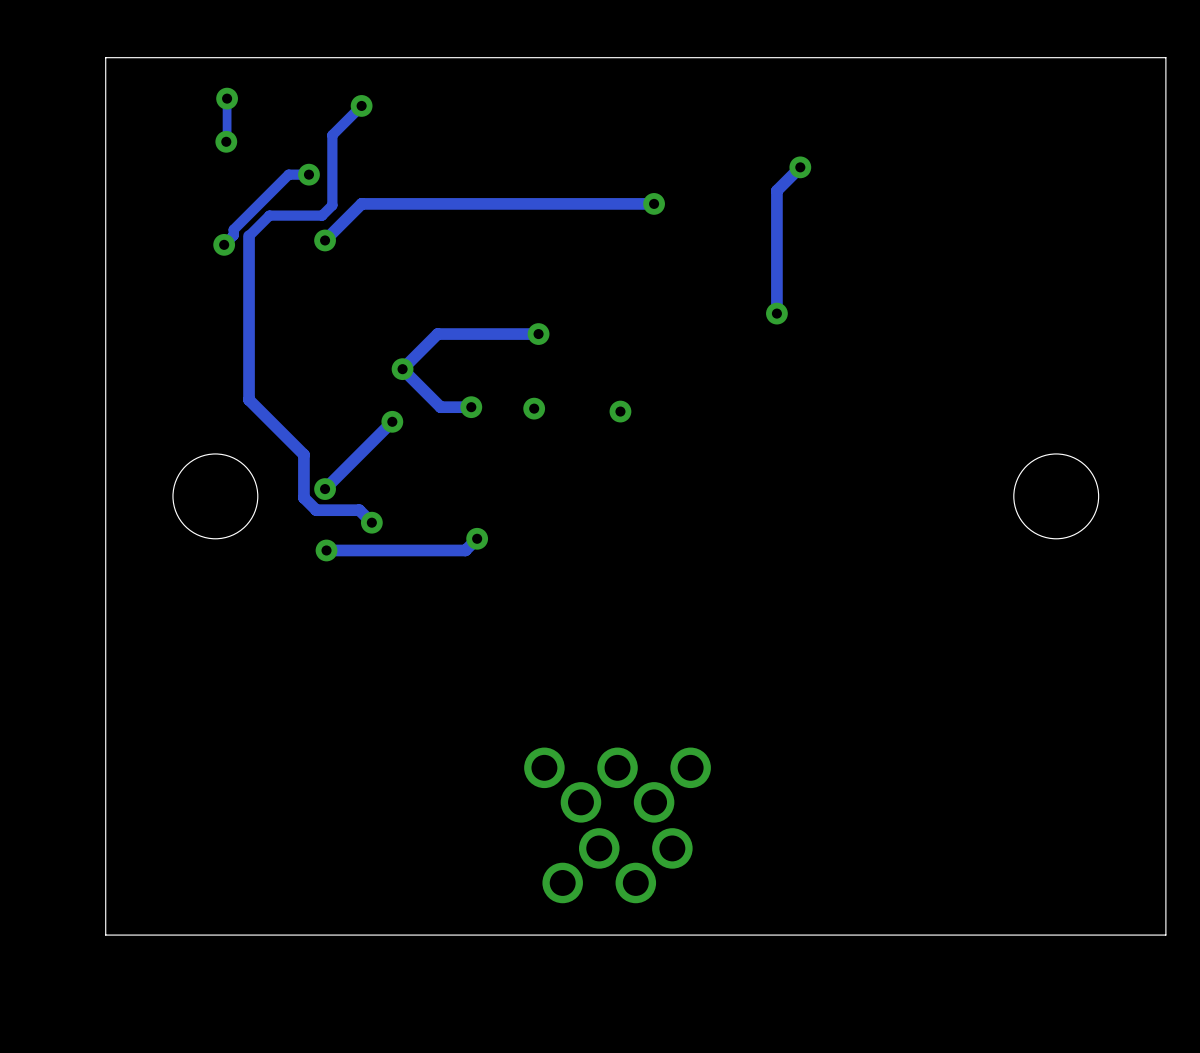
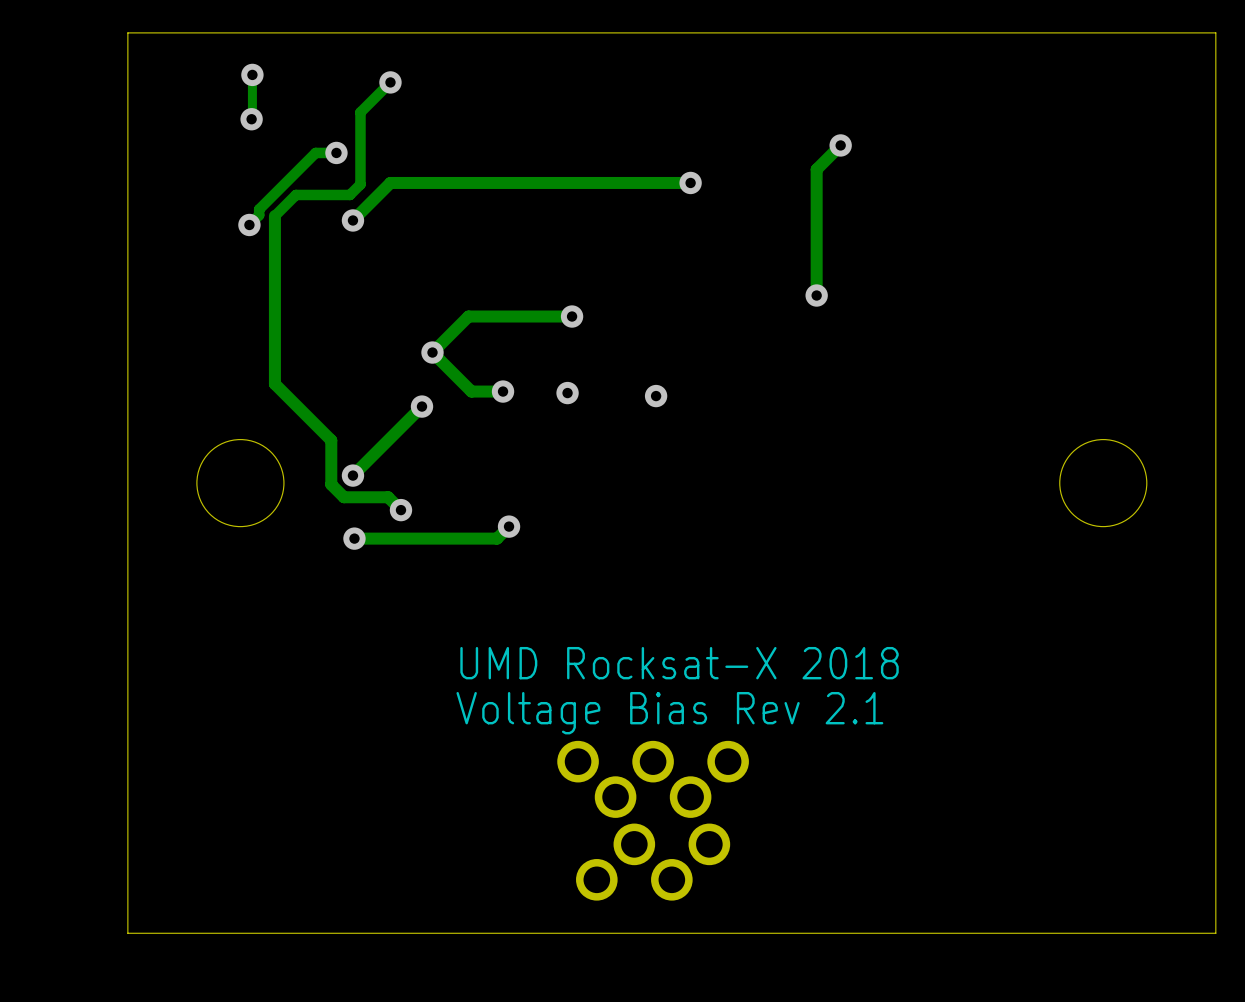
text: none -> UMD Rocksat-X 2018 (679, 663)
text: none -> Voltage Bias Rev 2.1 (669, 713)

